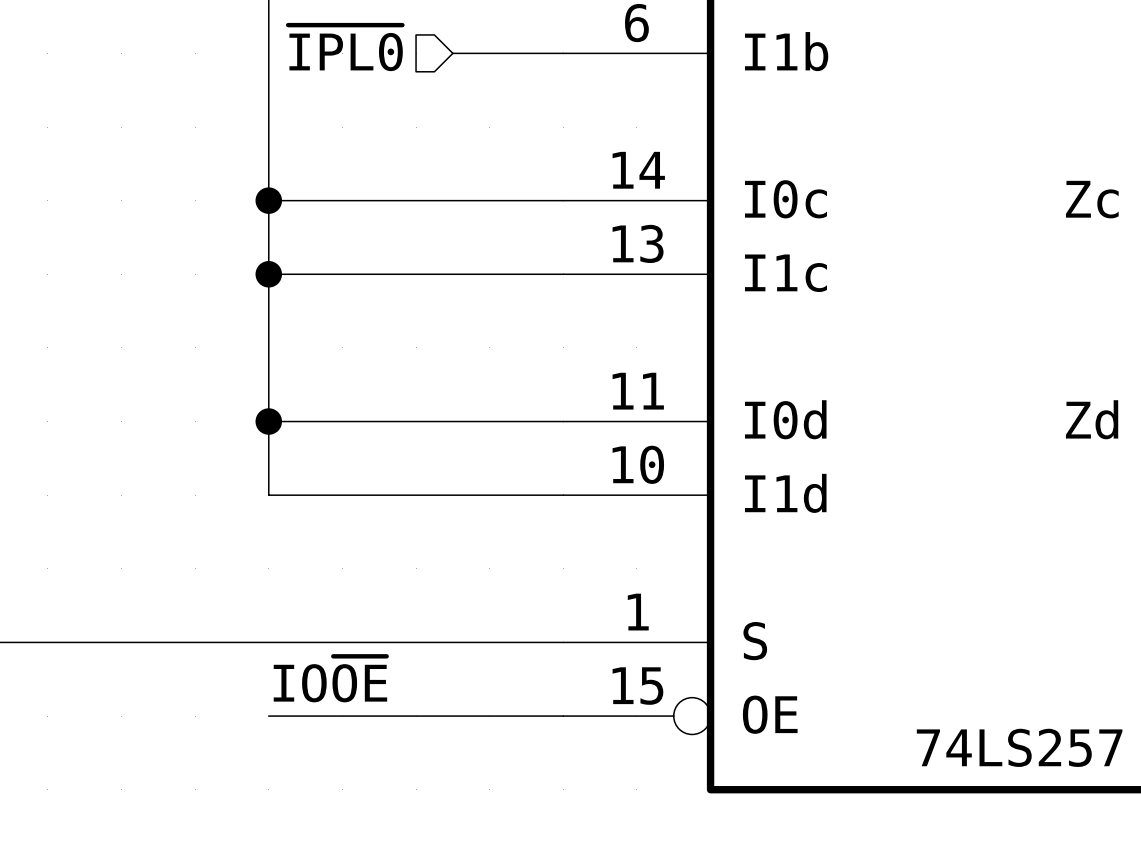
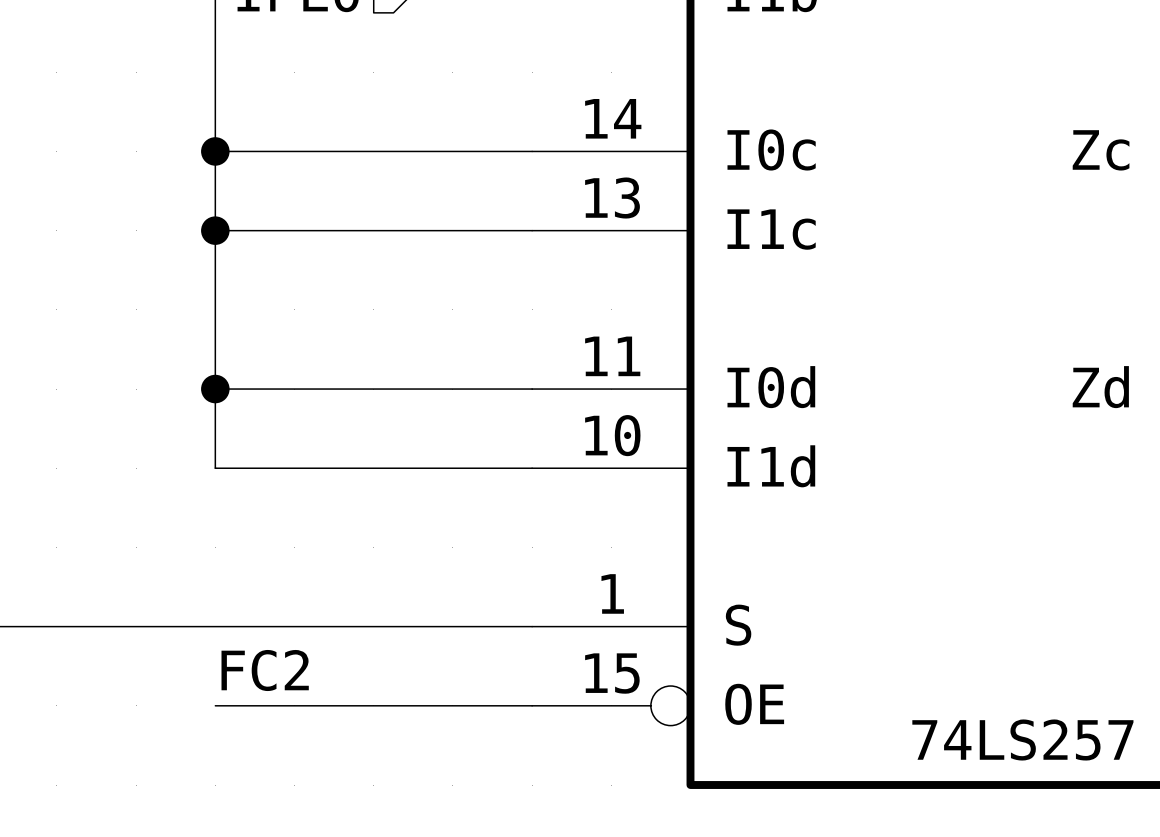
label: IO~{OE} (330, 679) -> FC2 (265, 670)

